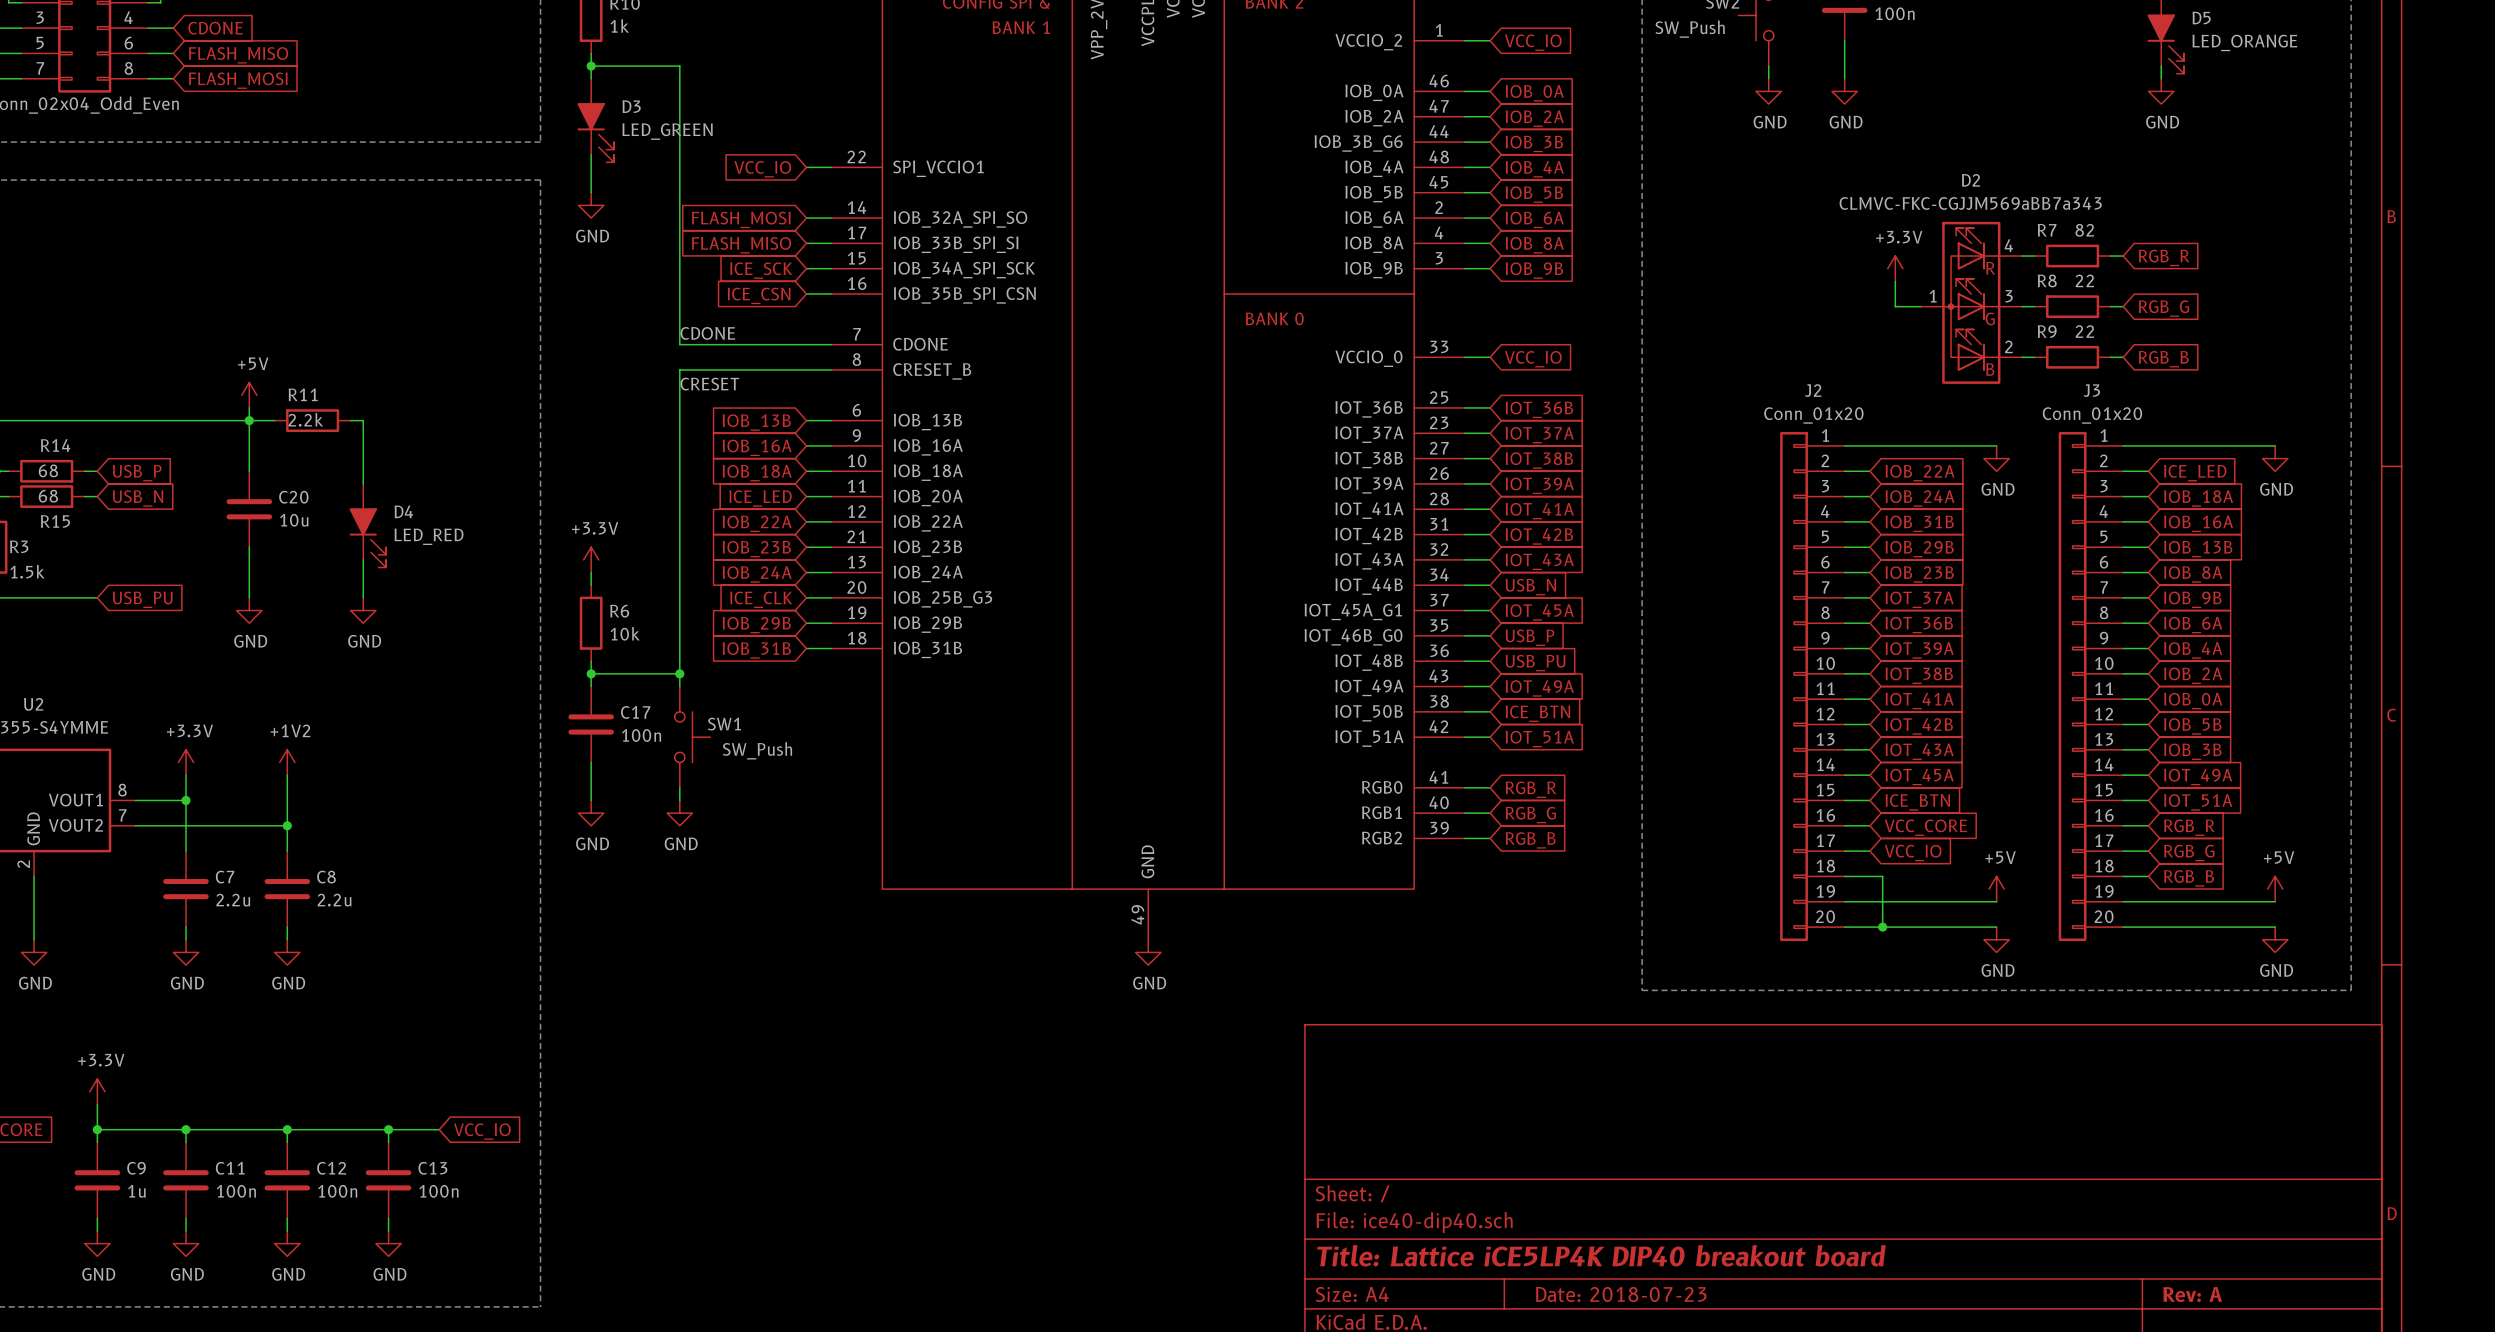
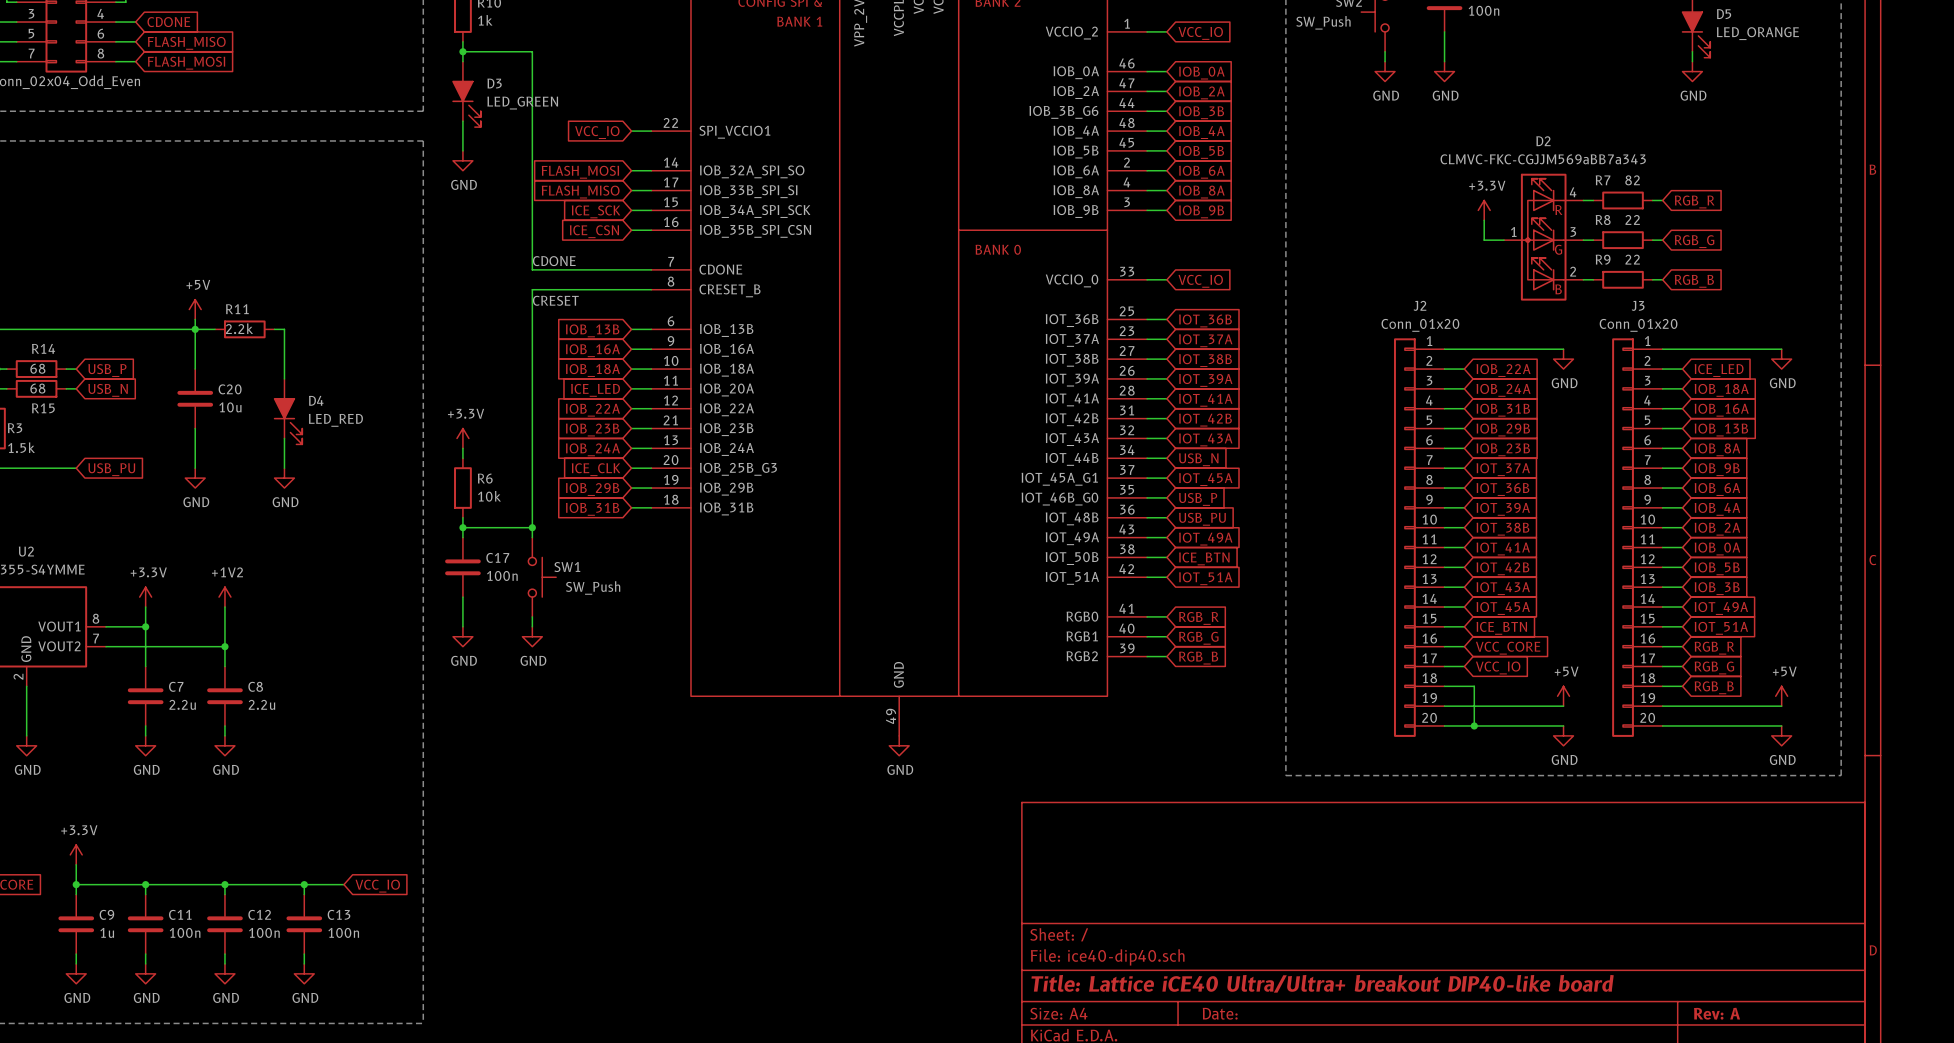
title block: Title: Lattice iCE5LP4K DIP40 breakout board (1601, 1255) -> Title: Lattice iCE40 Ultra/Ultra+ breakout DIP40-like board (1322, 983)
title block: Date: 2018-07-23 (1621, 1294) -> Date: (1220, 1013)

